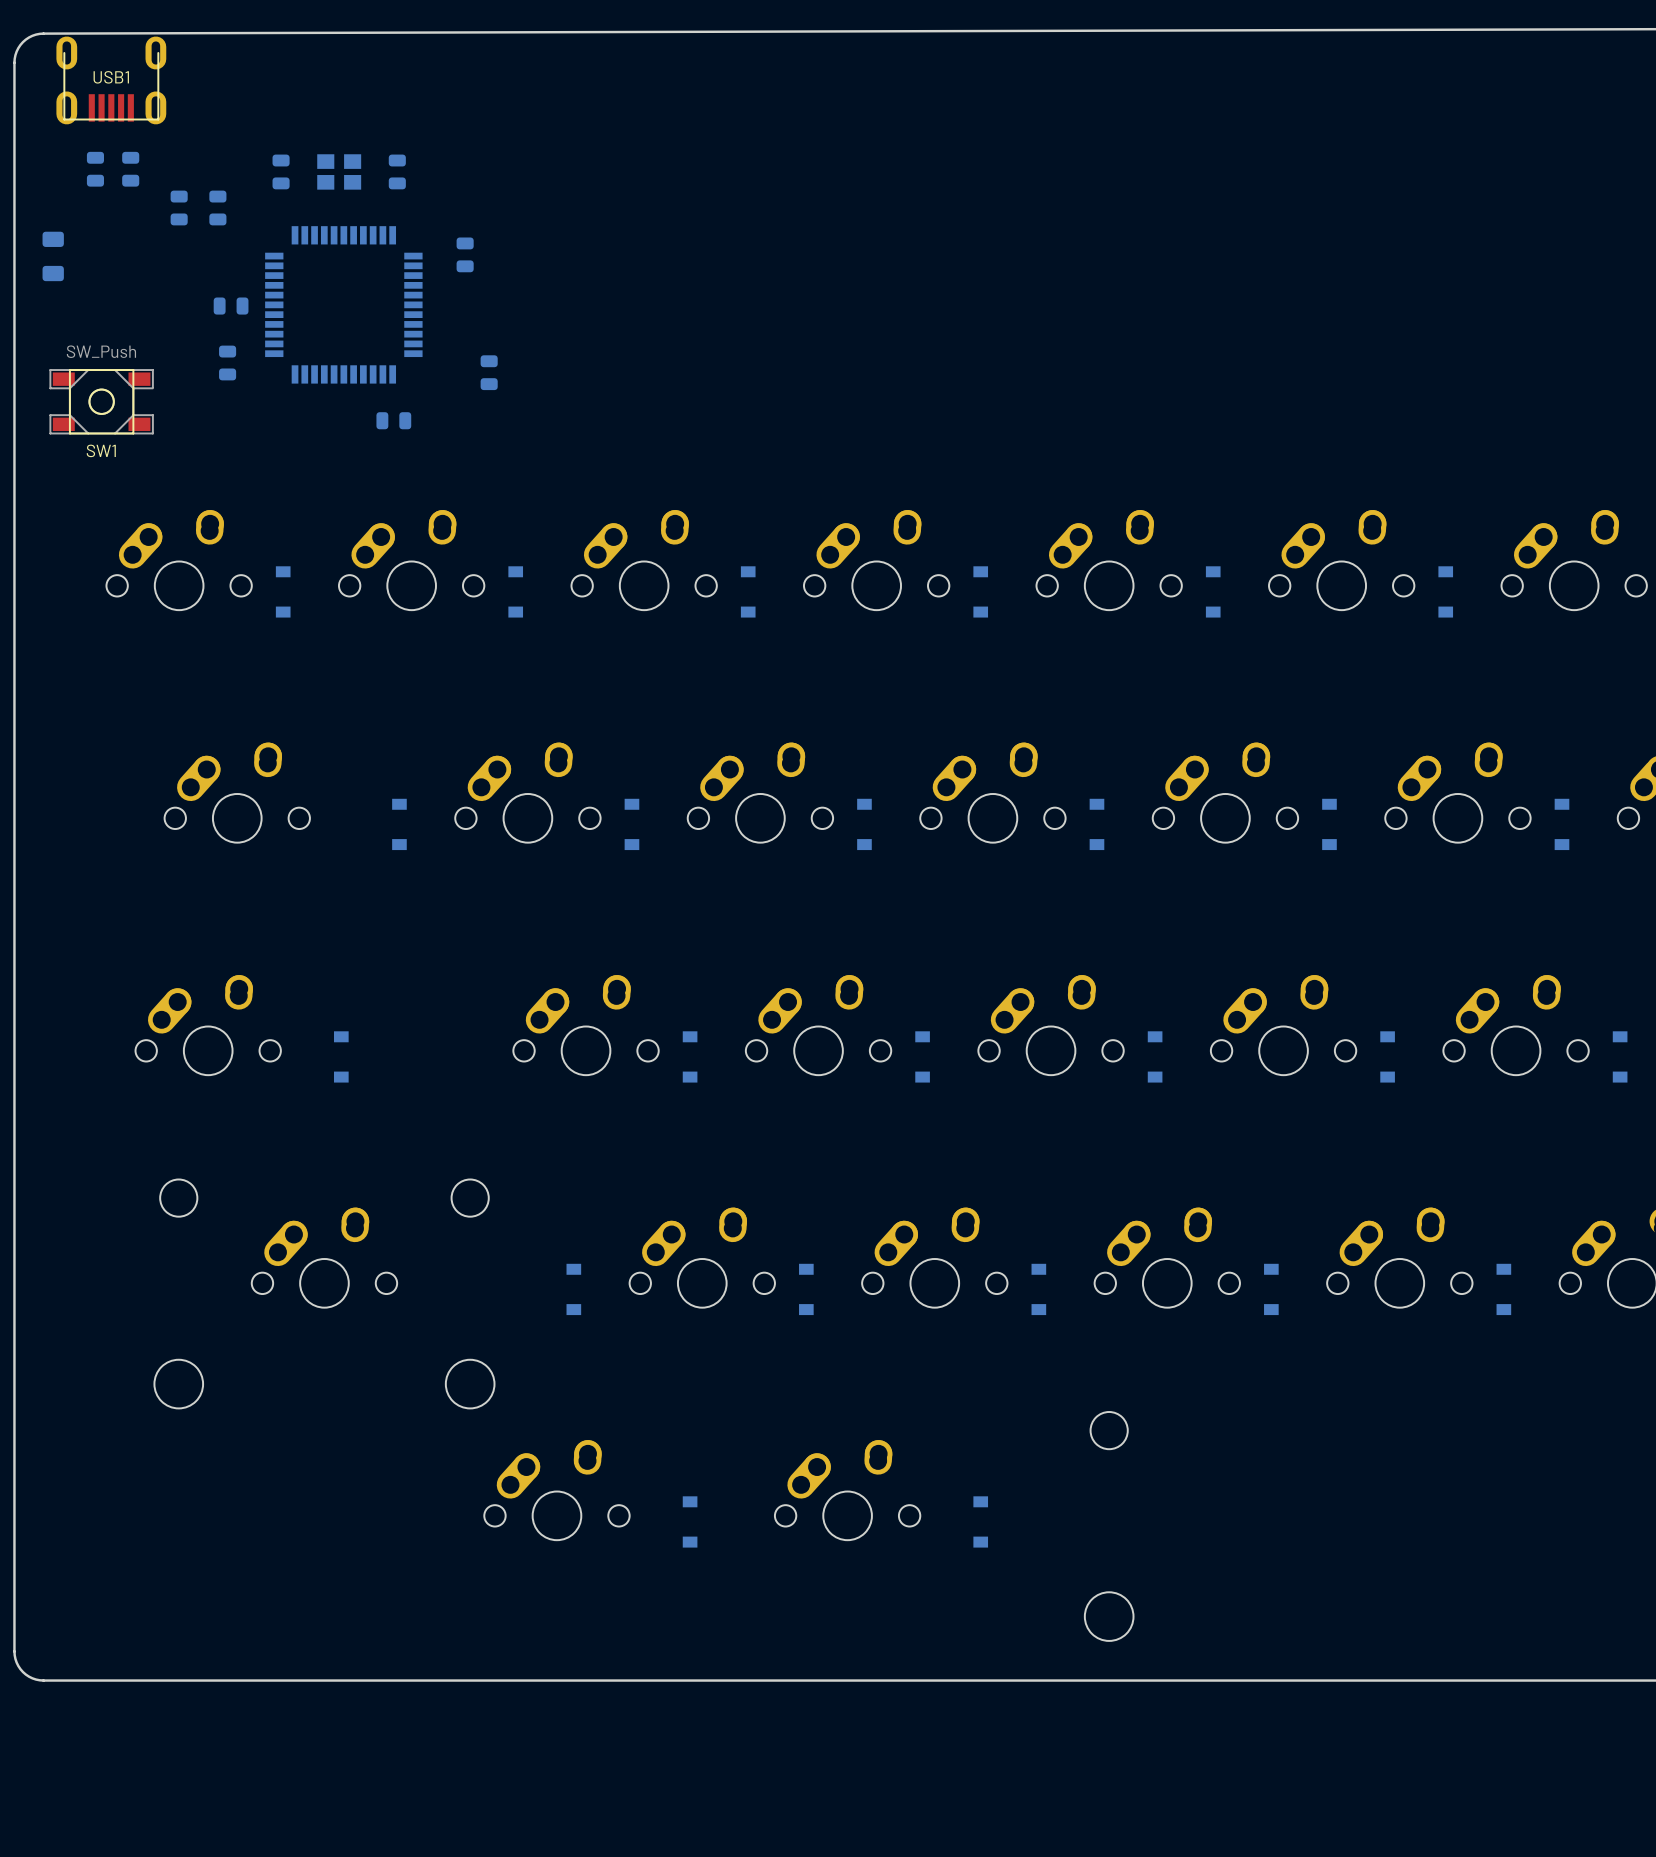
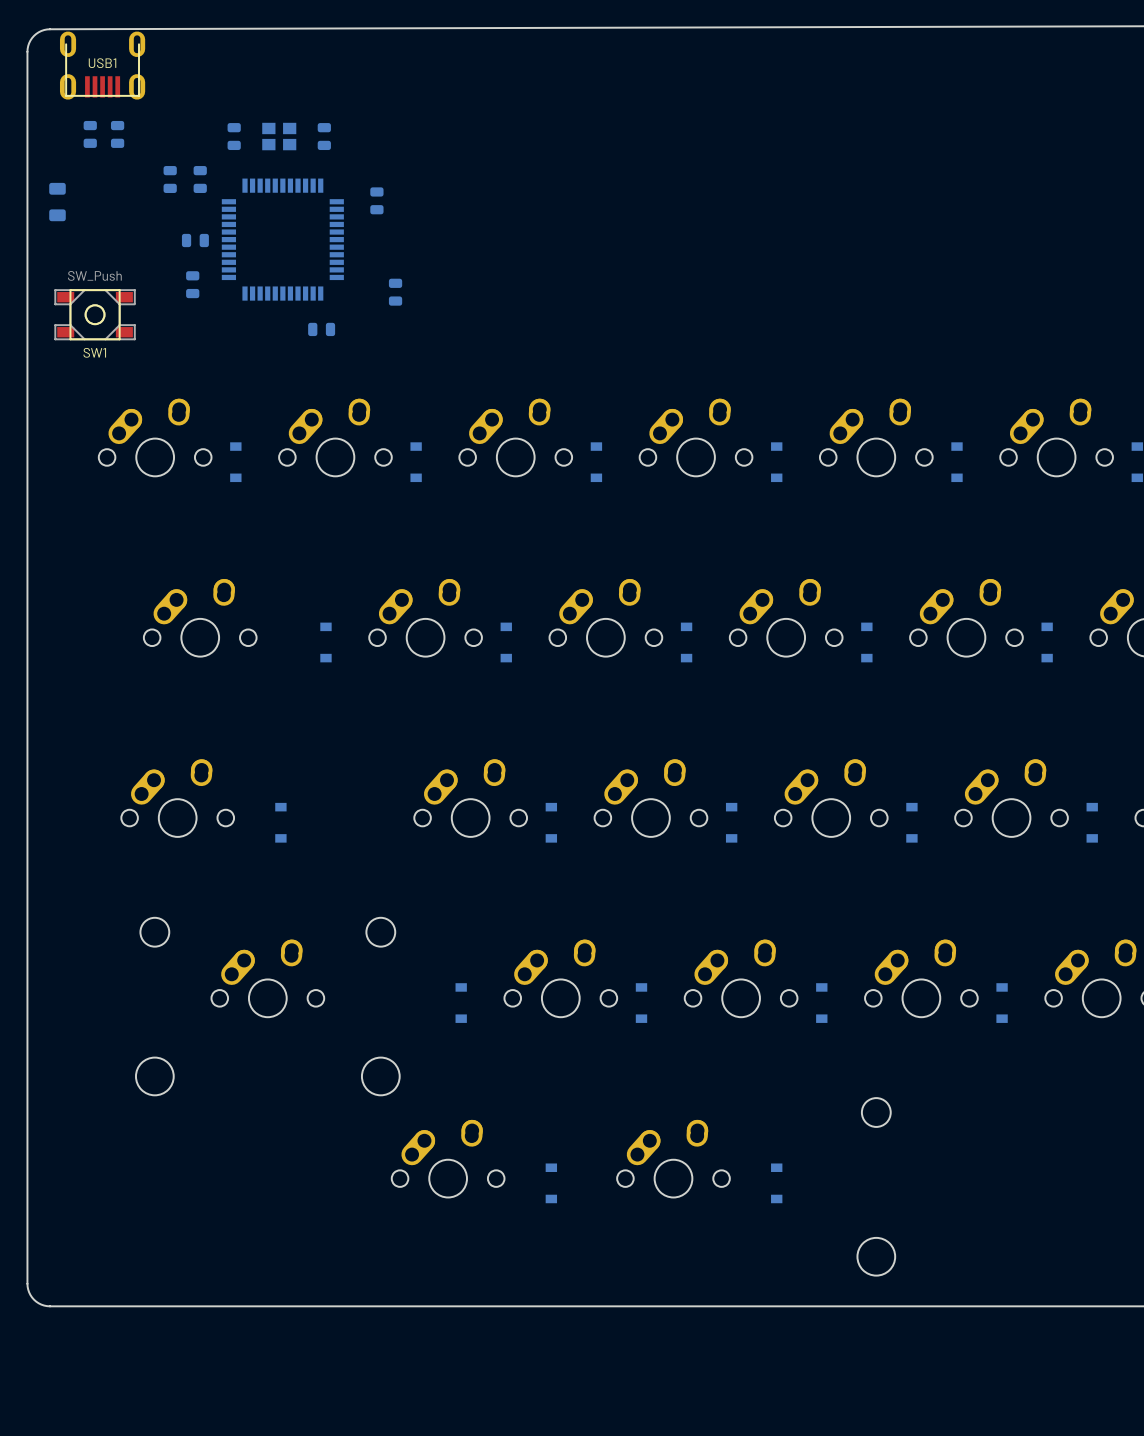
part: (179, 207) -> none
part: (217, 207) -> none
part: none -> (170, 179)
part: none -> (200, 179)

